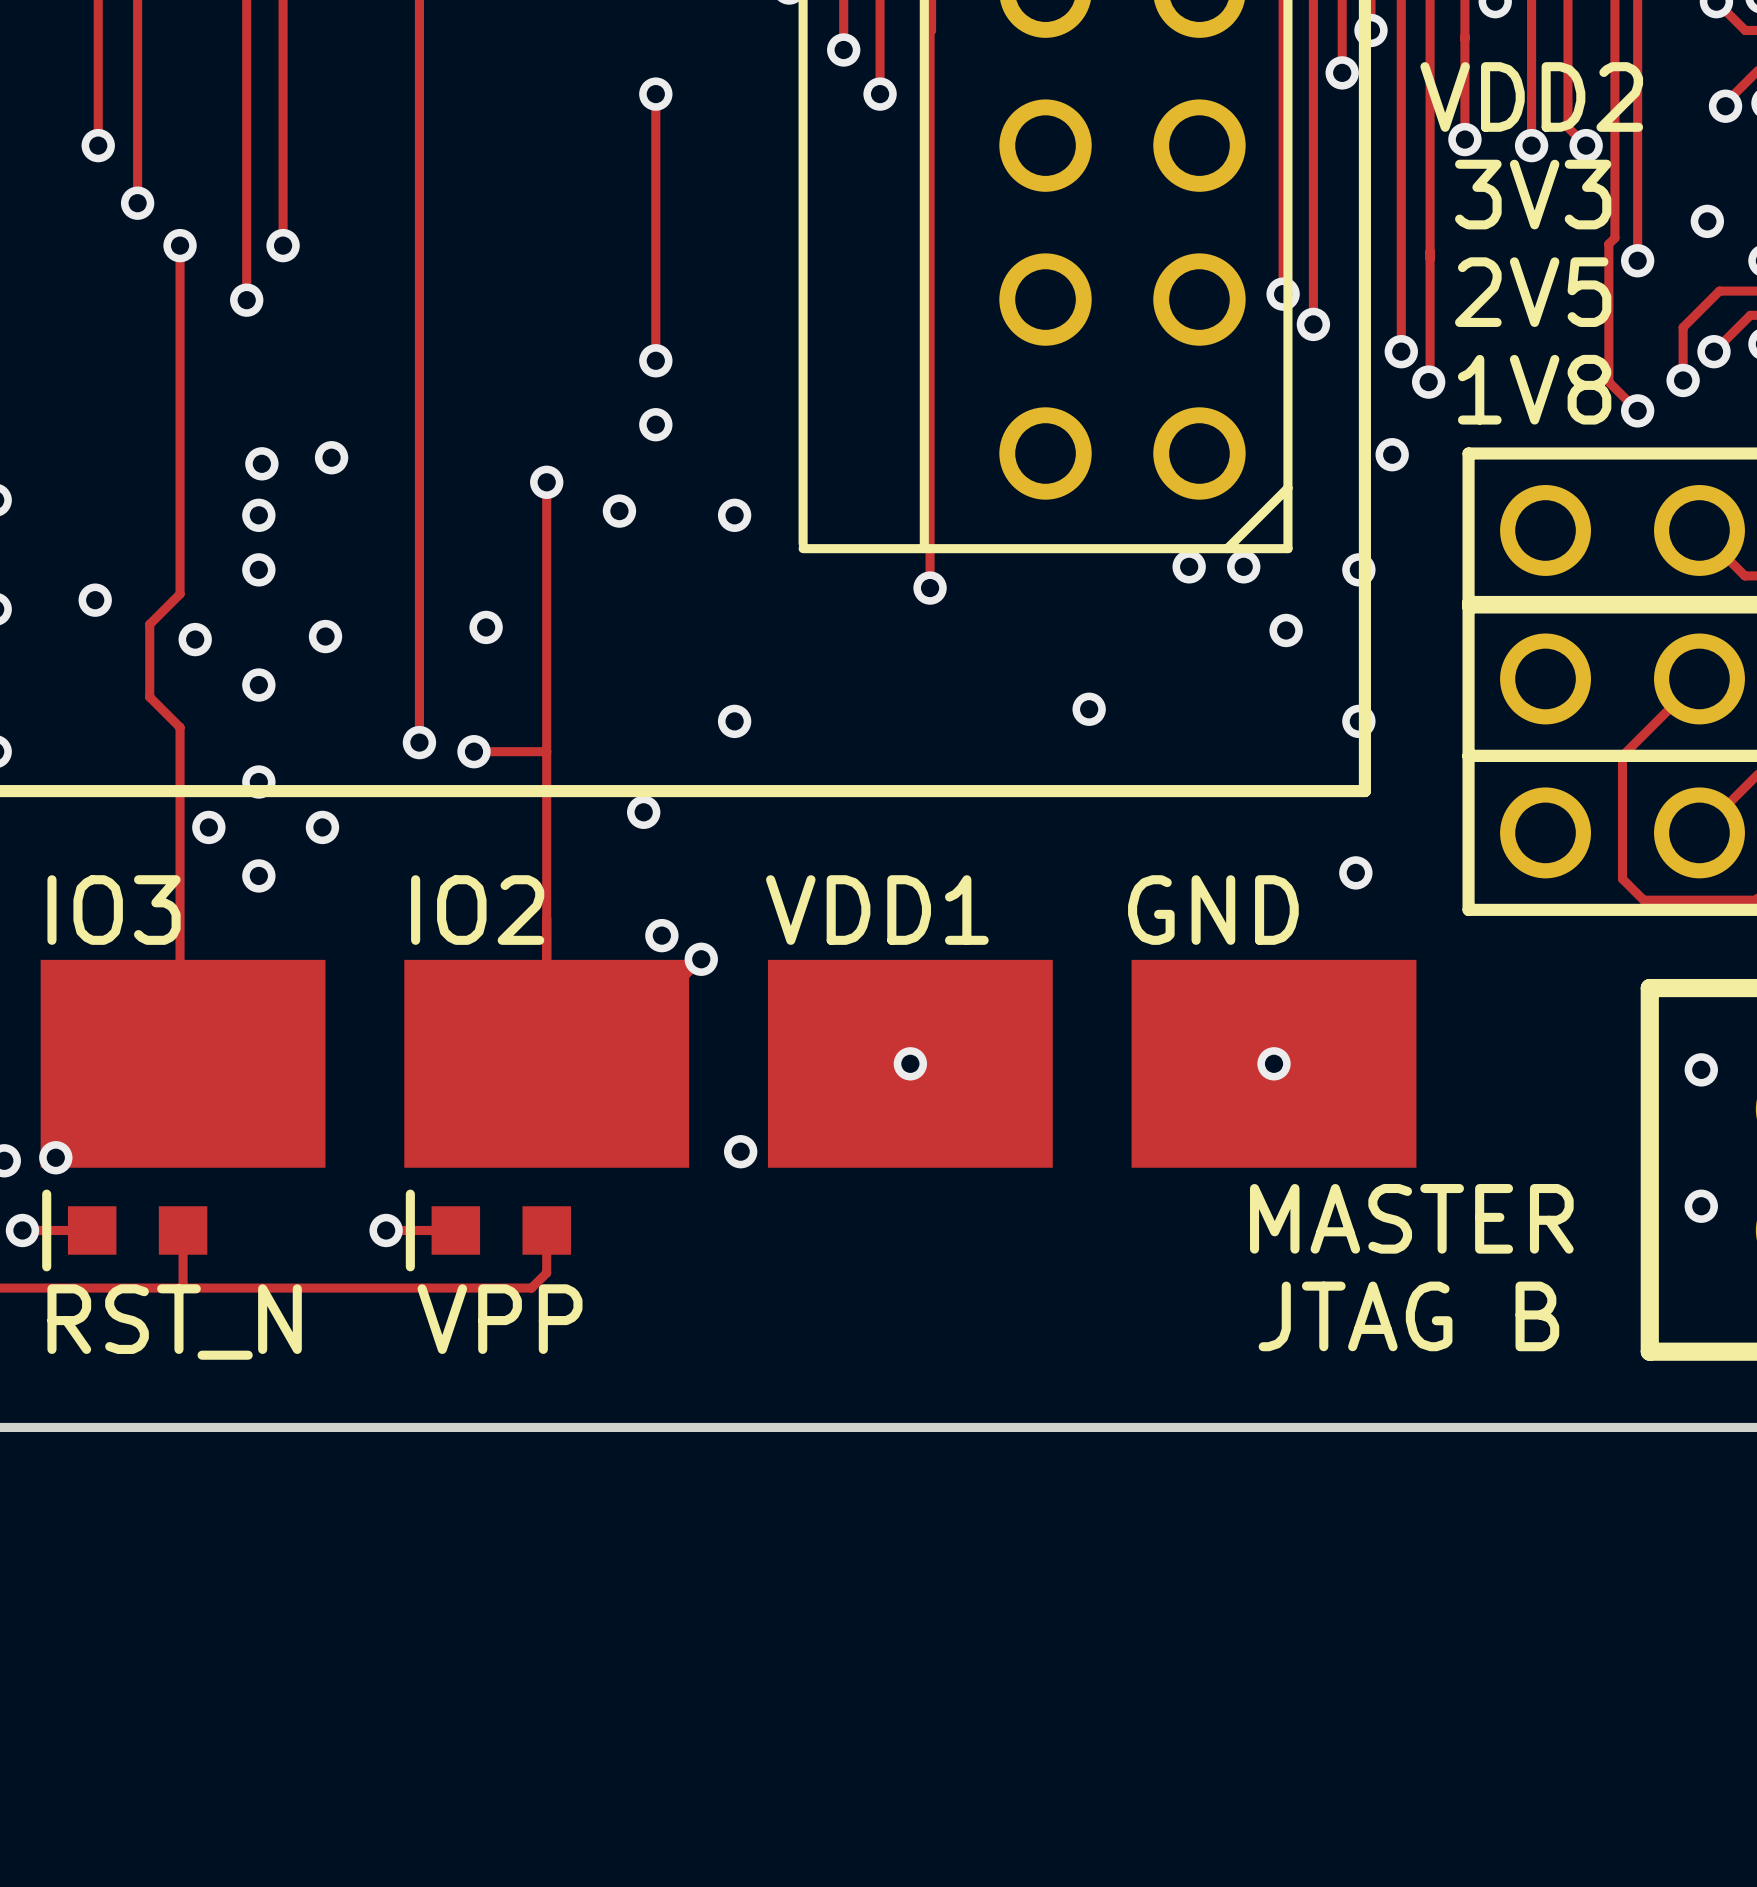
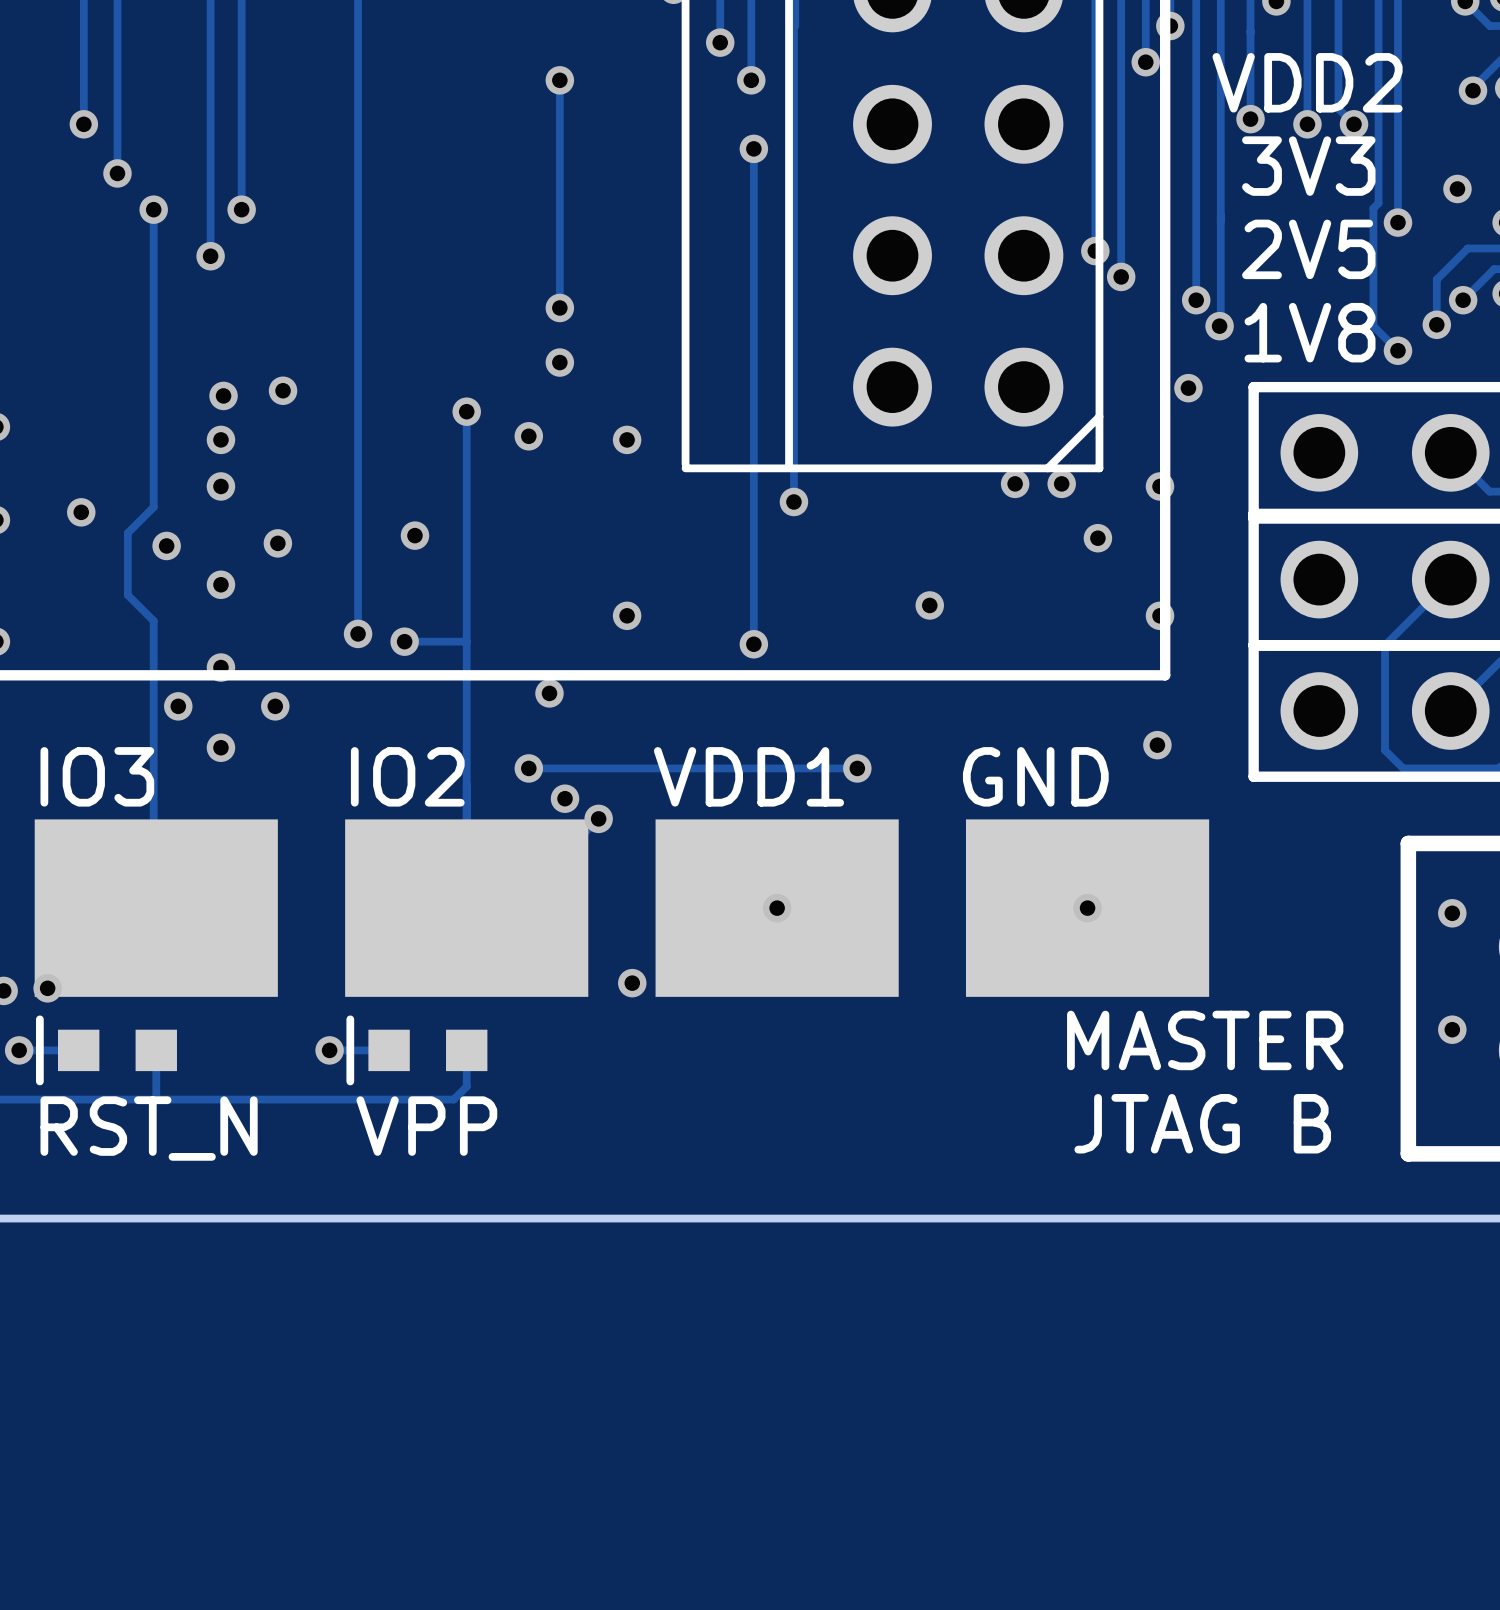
track: none -> (753, 148) (753, 644)
via: none -> (753, 148)
via: none -> (753, 644)
track: none -> (528, 768) (857, 768)
via: none -> (528, 768)
via: none -> (857, 768)

